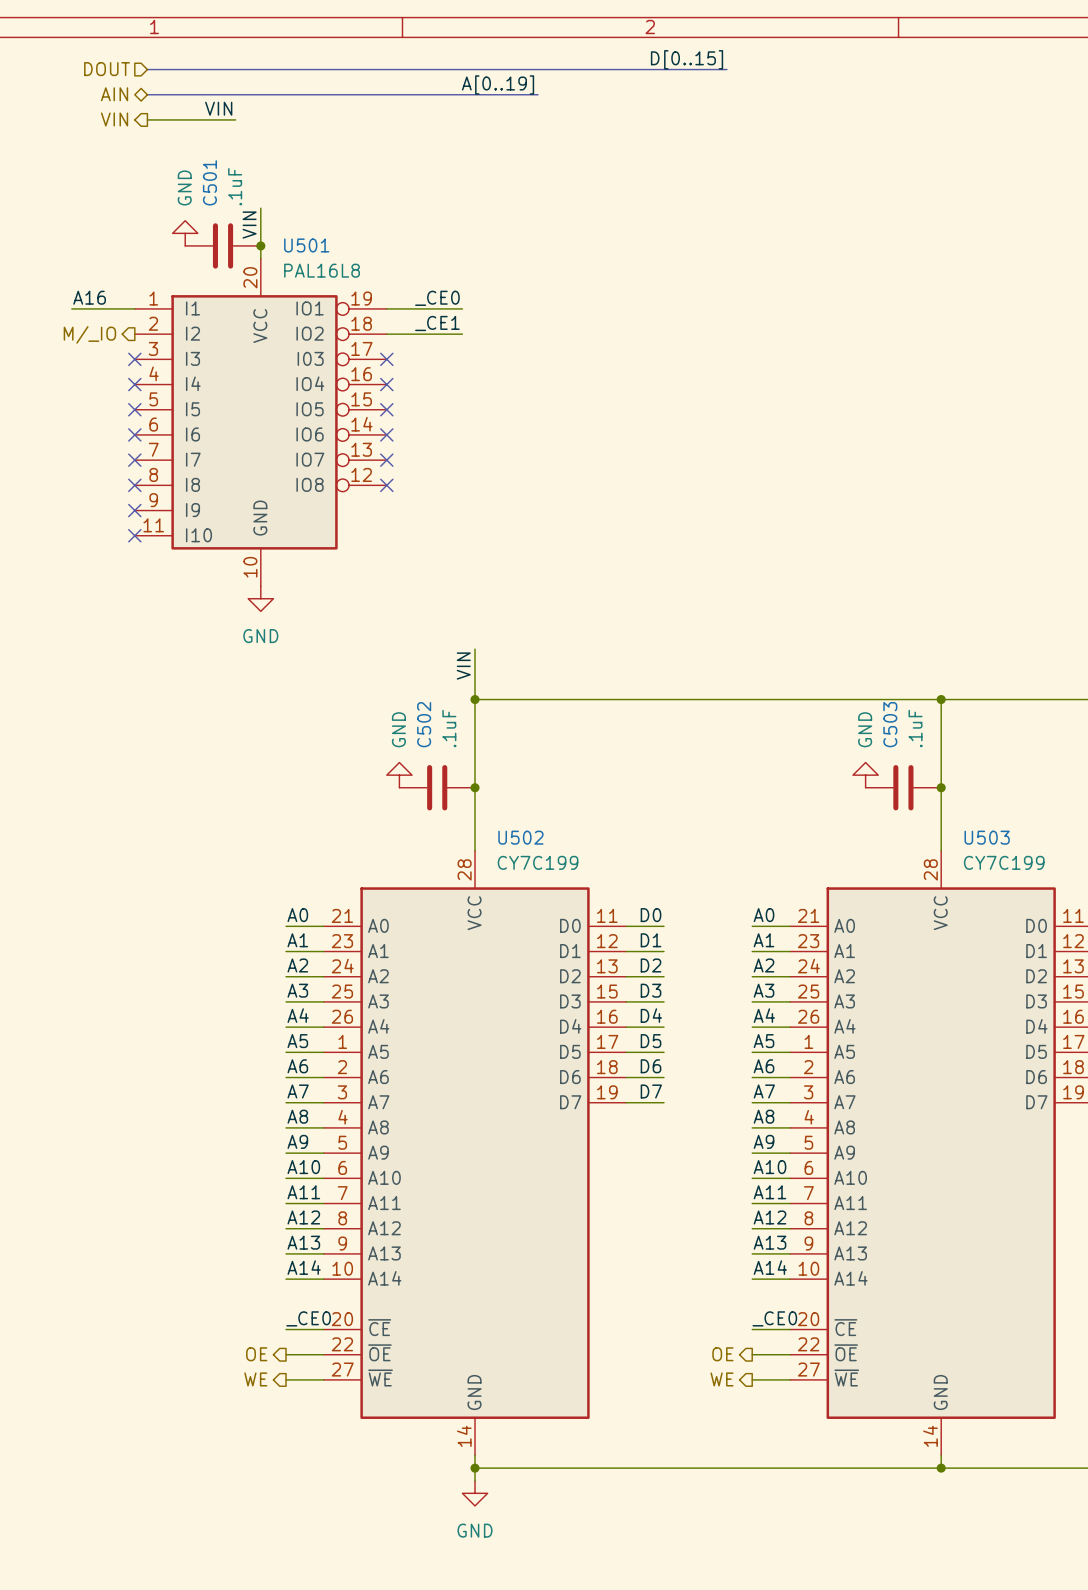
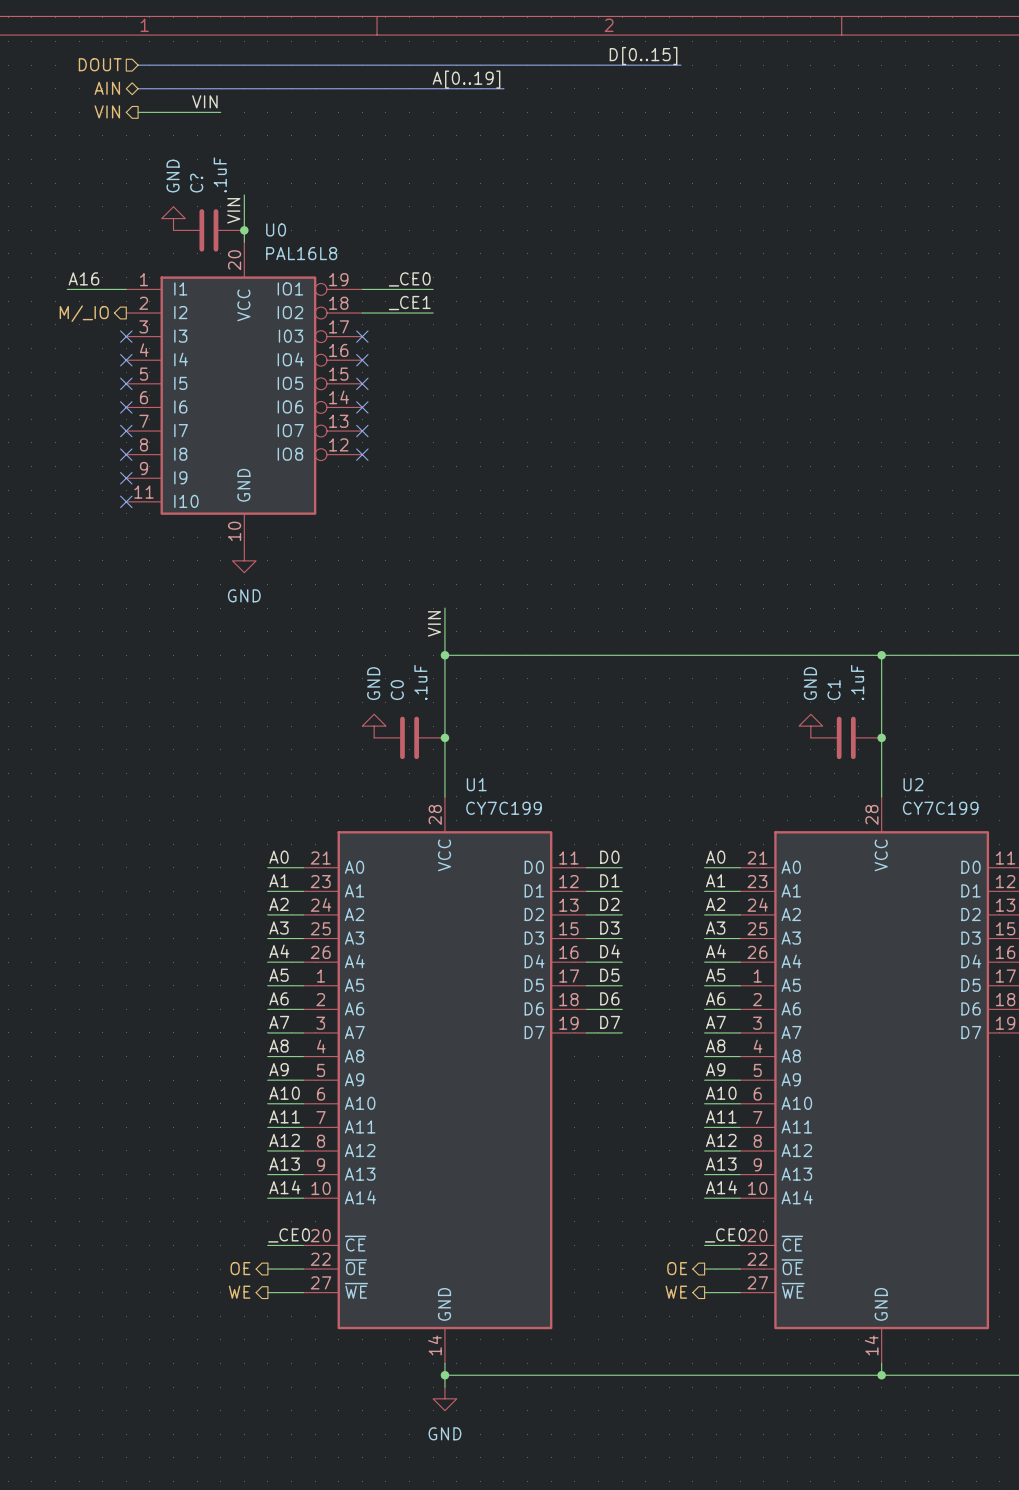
C501 name: C501 (209, 182) -> C? (196, 183)
U501 name: U501 (306, 245) -> U0 (276, 229)
C502 name: C502 (424, 724) -> C0 (397, 690)
C503 name: C503 (890, 724) -> C1 (834, 690)
U502 name: U502 (520, 837) -> U1 (476, 784)
U503 name: U503 (987, 837) -> U2 (913, 784)

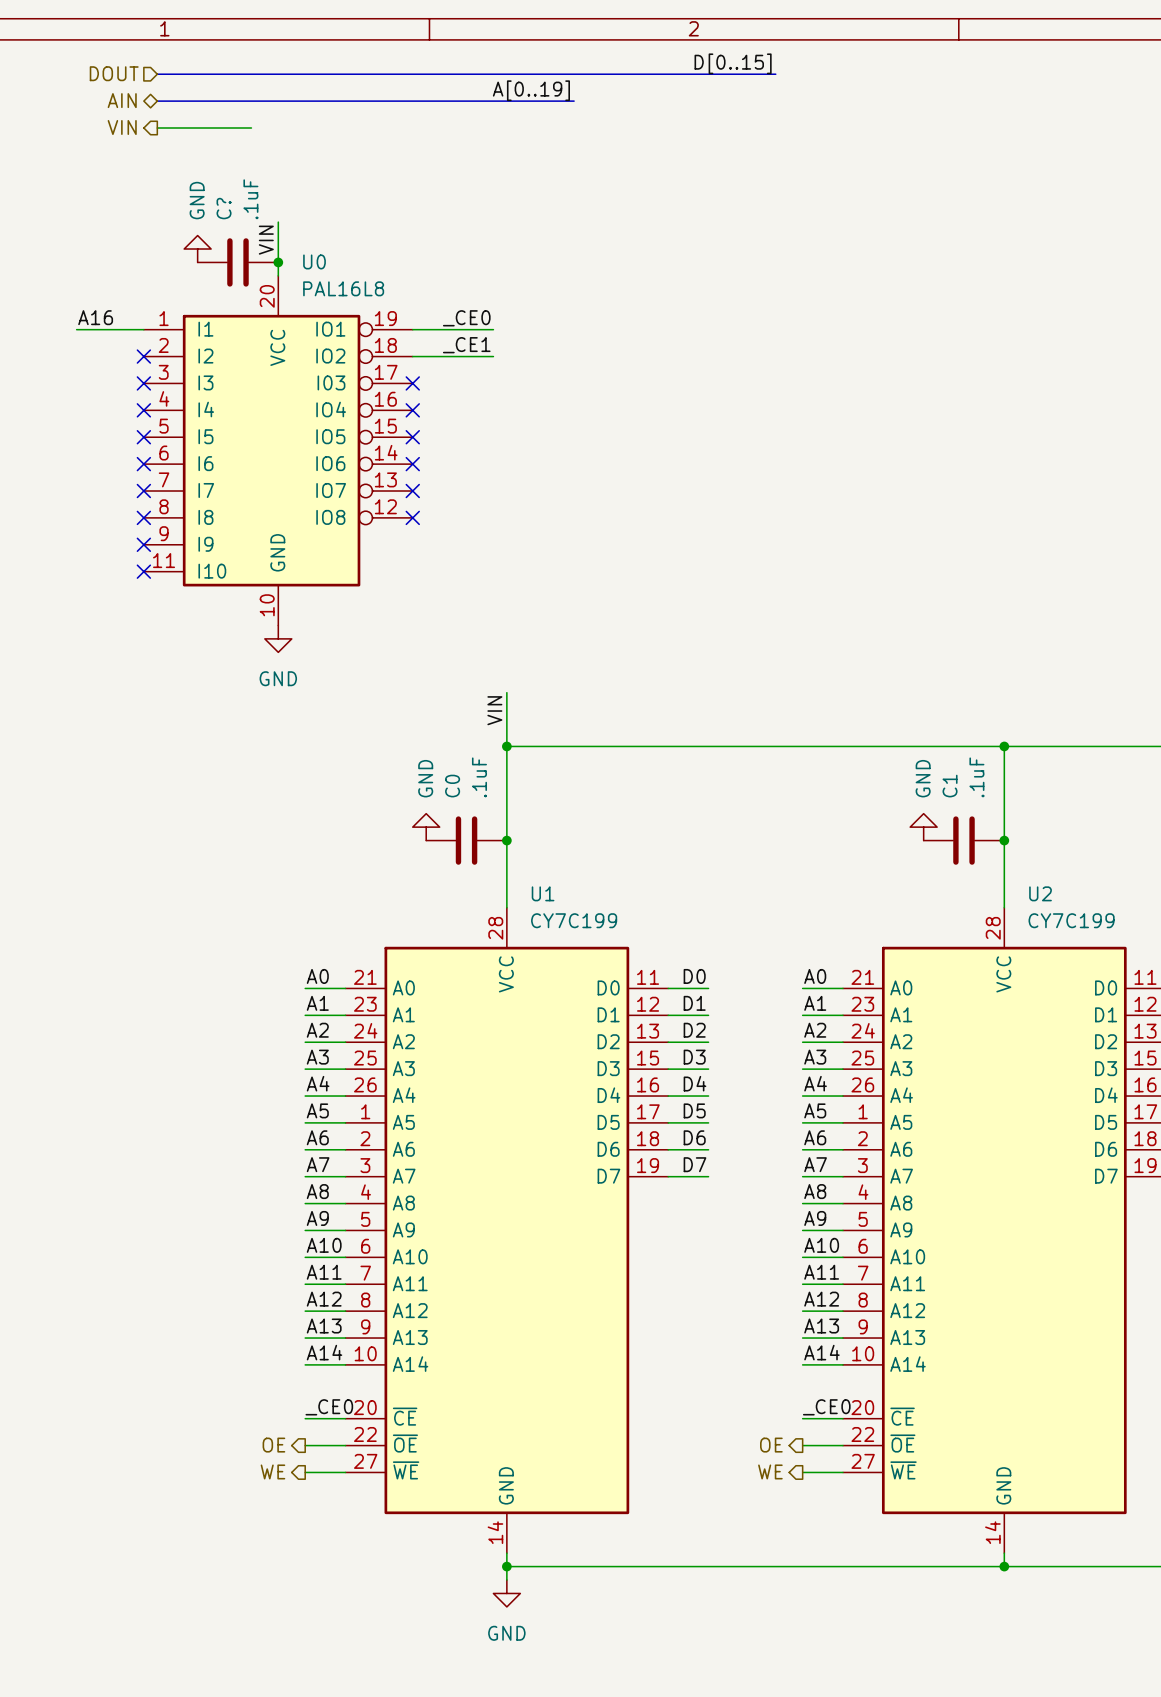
label: VIN (204, 101) -> none
hierarchical label: M/_IO (84, 313) -> none
no-connect mark: none -> (143, 356)

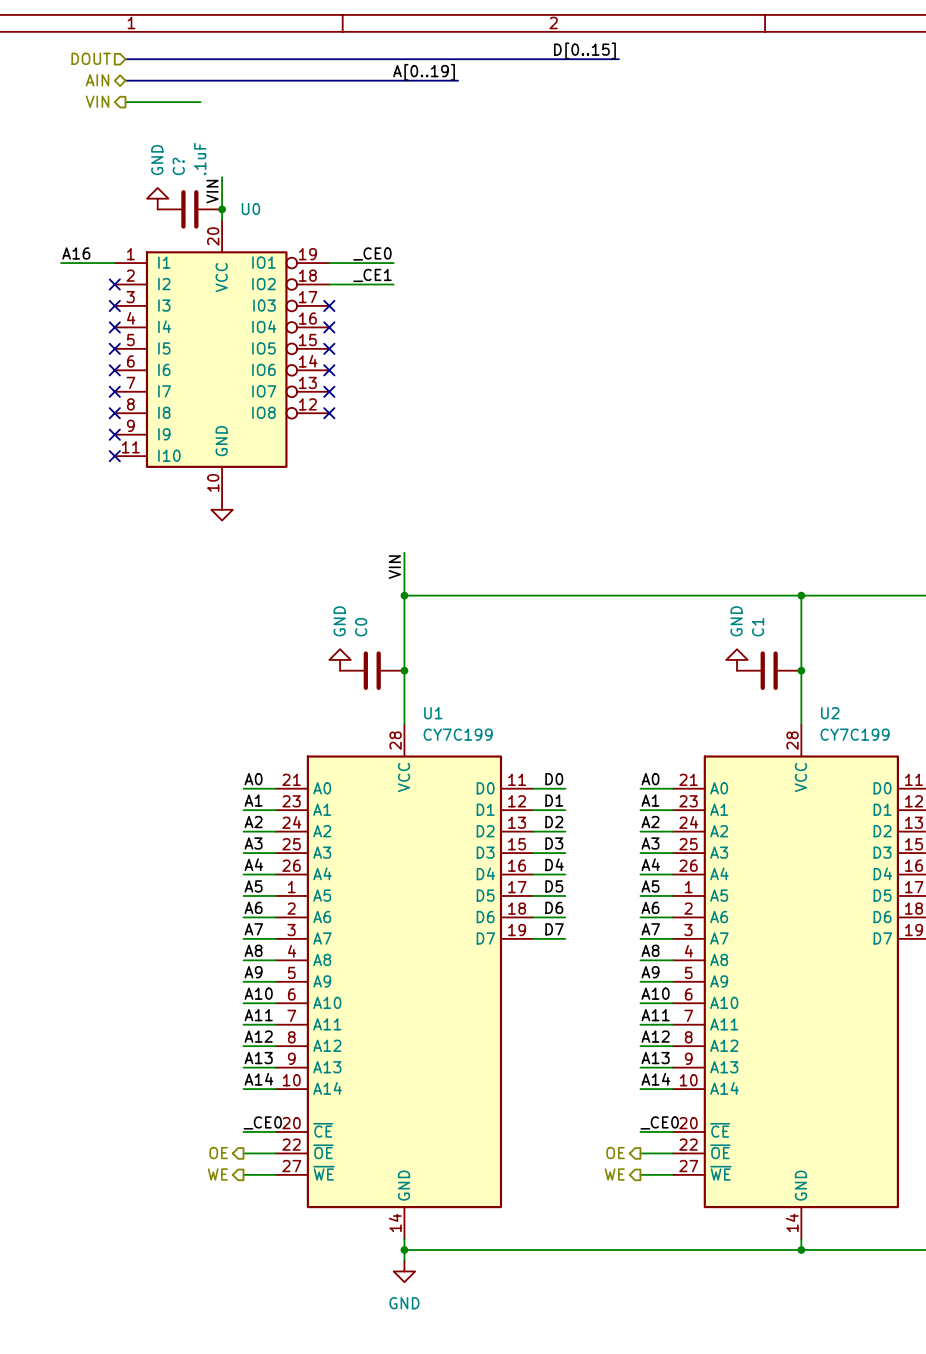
U0 value: PAL16L8 (343, 288) -> none
power symbol text: GND (278, 678) -> none
C0 value: .1uF (479, 777) -> none
C1 value: .1uF (976, 777) -> none

